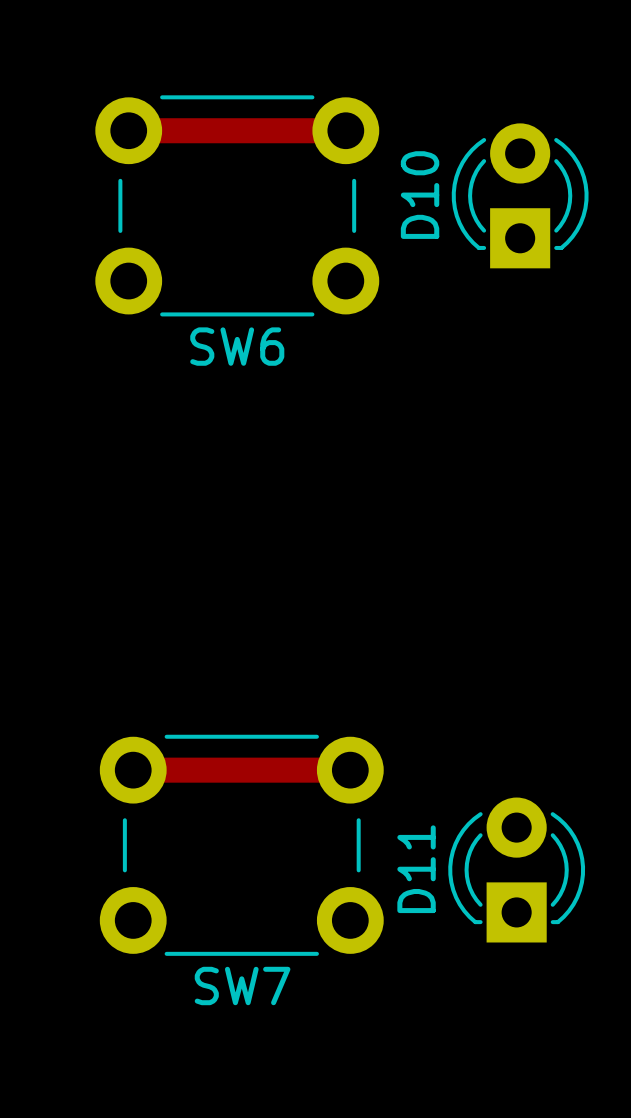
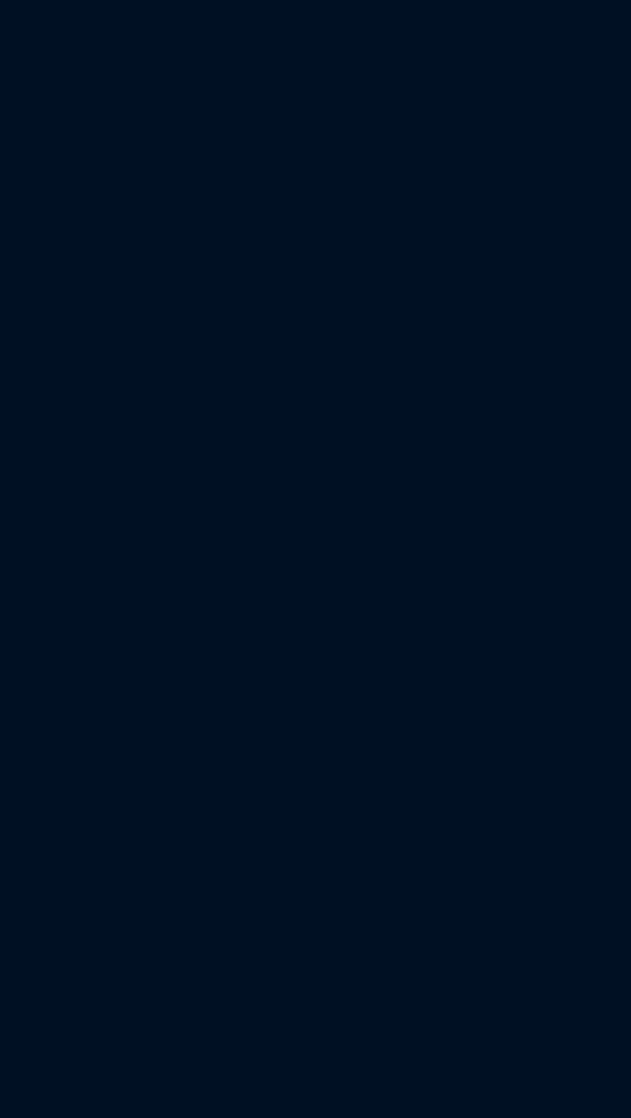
track: (128, 130) (345, 130) -> none
D10: (520, 195) -> none
SW6: (237, 205) -> none
track: (133, 770) (350, 770) -> none
SW7: (241, 845) -> none
D11: (516, 870) -> none

